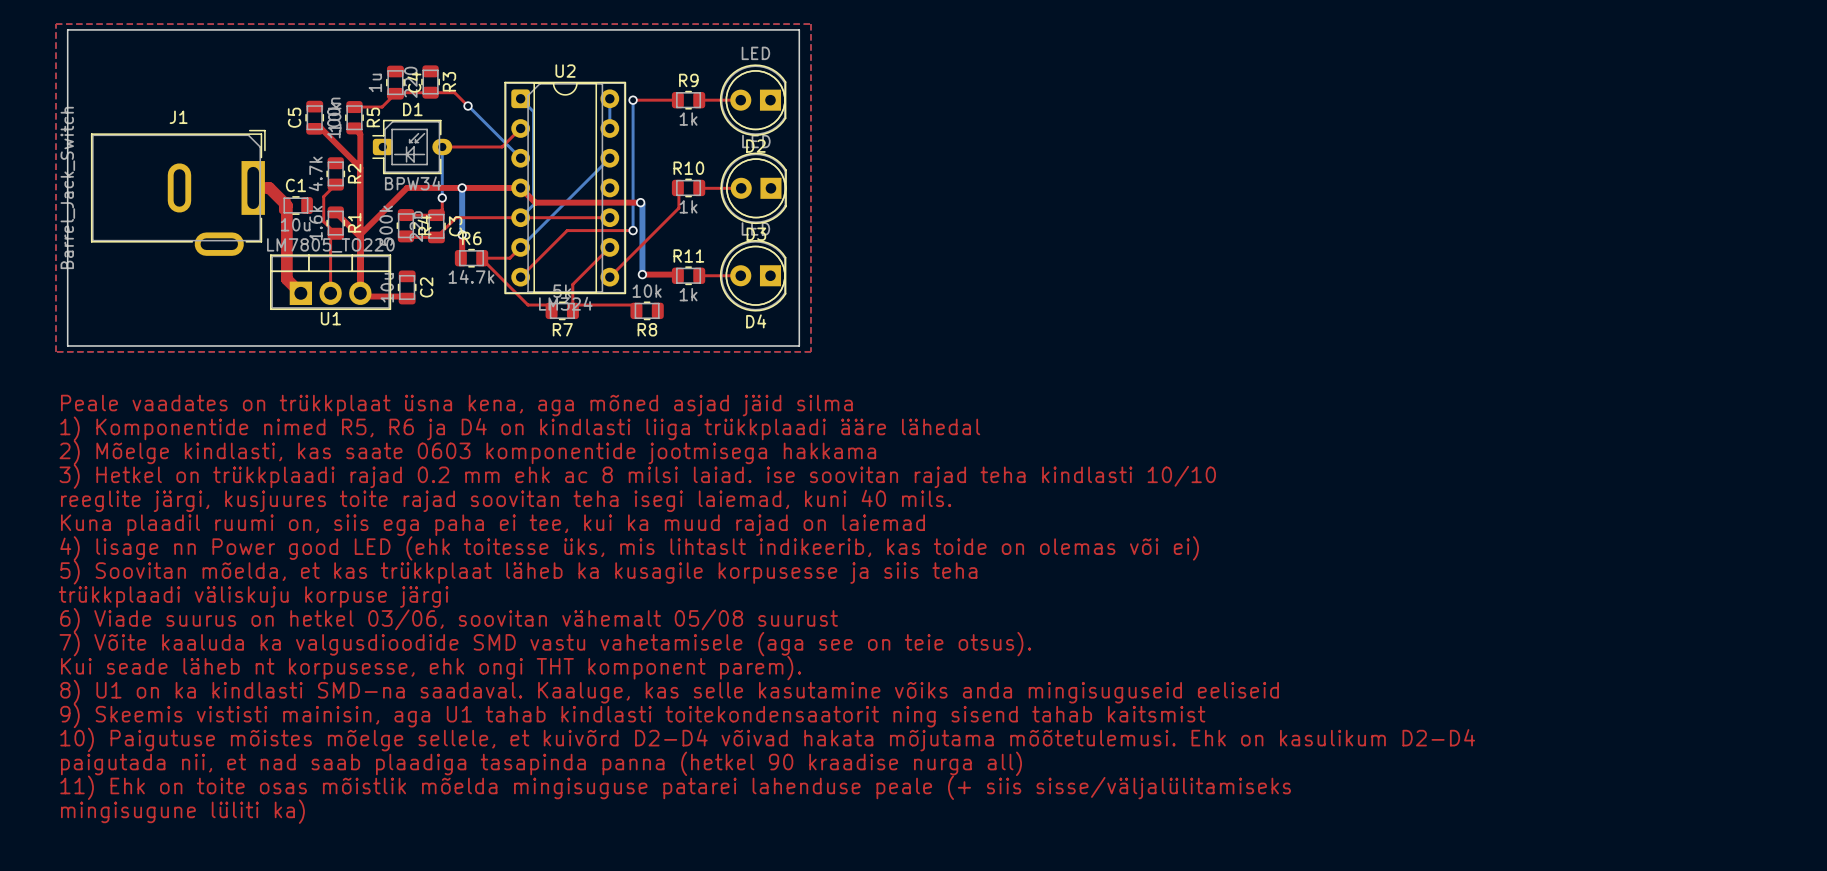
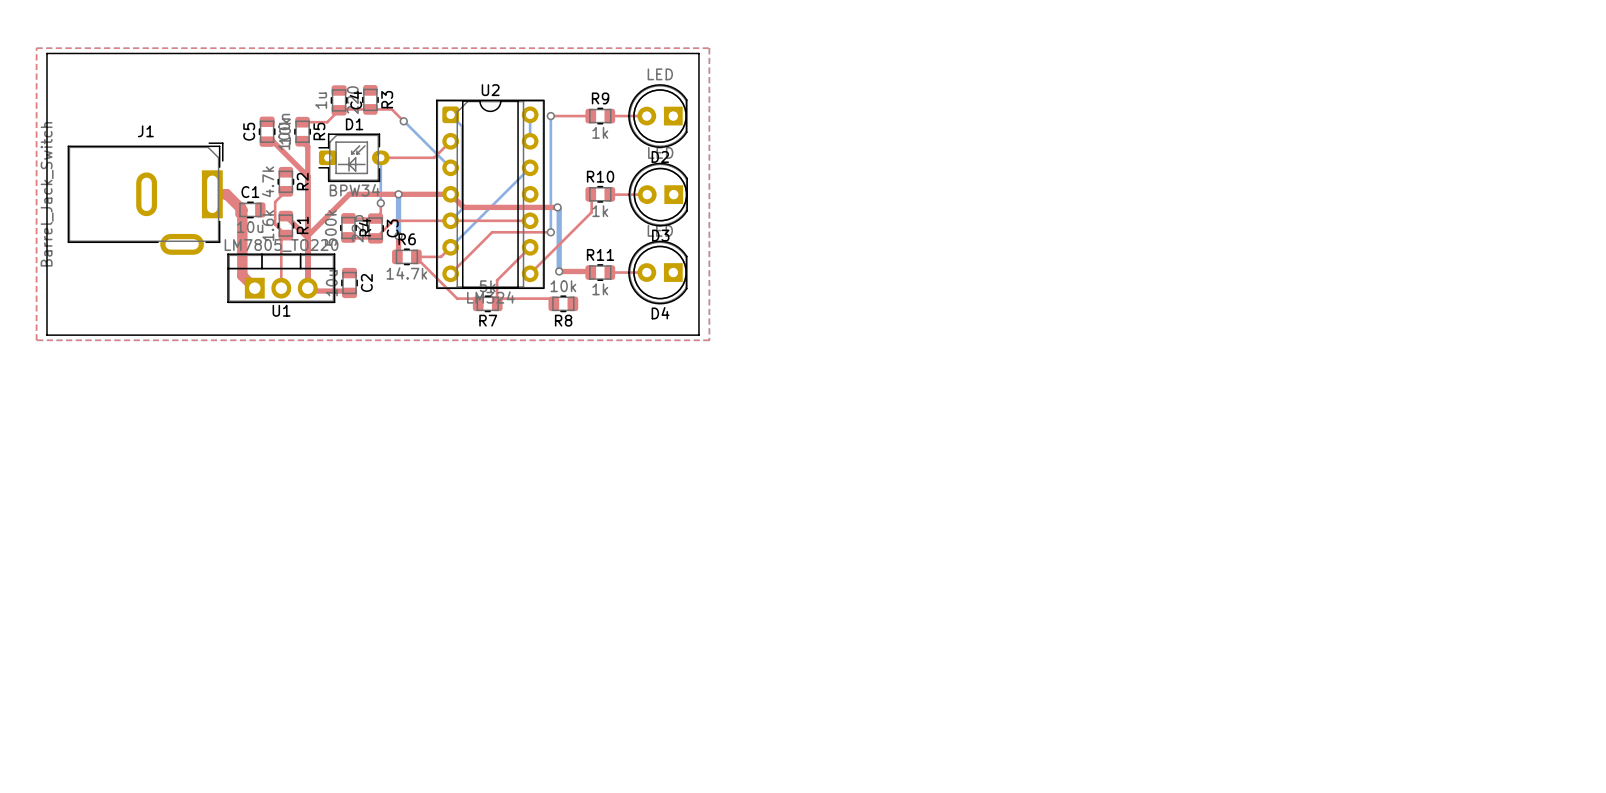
text: Peale vaadates on trükkplaat üsna kena, aga mõned asjad jäid silma (456, 405) -> none
text: 1) Komponentide nimed R5, R6 ja D4 on kindlasti liiga trükkplaadi ääre lähedal (520, 428) -> none
text: 2) Mõelge kindlasti, kas saate 0603 komponentide jootmisega hakkama (467, 452) -> none
text: 3) Hetkel on trükkplaadi rajad 0.2 mm ehk ac 8 milsi laiad. ise soovitan rajad teha kindlasti 10/10 (637, 476) -> none
text: reeglite järgi, kusjuures toite rajad soovitan teha isegi laiemad, kuni 40 mils. (506, 500) -> none
text: Kuna plaadil ruumi on, siis ega paha ei tee, kui ka muud rajad on laiemad (492, 525) -> none
text: 4) lisage nn Power good LED (ehk toitesse üks, mis lihtaslt indikeerib, kas toide on olemas või ei) (629, 548) -> none
text: 5) Soovitan mõelda, et kas trükkplaat läheb ka kusagile korpusesse ja siis teha (518, 572) -> none
text: trükkplaadi väliskuju korpuse järgi (253, 596) -> none
text: 6) Viade suurus on hetkel 03/06, soovitan vähemalt 05/08 suurust (449, 620) -> none
text: 7) Võite kaaluda ka valgusdioodide SMD vastu vahetamisele (aga see on teie otsus). (545, 644) -> none
text: Kui seade läheb nt korpusesse, ehk ongi THT komponent parem). (431, 668) -> none
text: 8) U1 on ka kindlasti SMD-na saadaval. Kaaluge, kas selle kasutamine võiks anda mingisuguseid eeliseid (669, 692) -> none
text: 9) Skeemis vististi mainisin, aga U1 tahab kindlasti toitekondensaatorit ning sisend tahab kaitsmist (632, 715) -> none
text: 10) Paigutuse mõistes mõelge sellele, et kuivõrd D2-D4 võivad hakata mõjutama mõõtetulemusi. Ehk on kasulikum D2-D4 (767, 739) -> none
text: paigutada nii, et nad saab plaadiga tasapinda panna (hetkel 90 kraadise nurga all) (541, 763) -> none
text: 11) Ehk on toite osas mõistlik mõelda mingisuguse patarei lahenduse peale (+ siis sisse/väljalülitamiseks (675, 787) -> none
text: mingisugune lüliti ka) (182, 811) -> none

